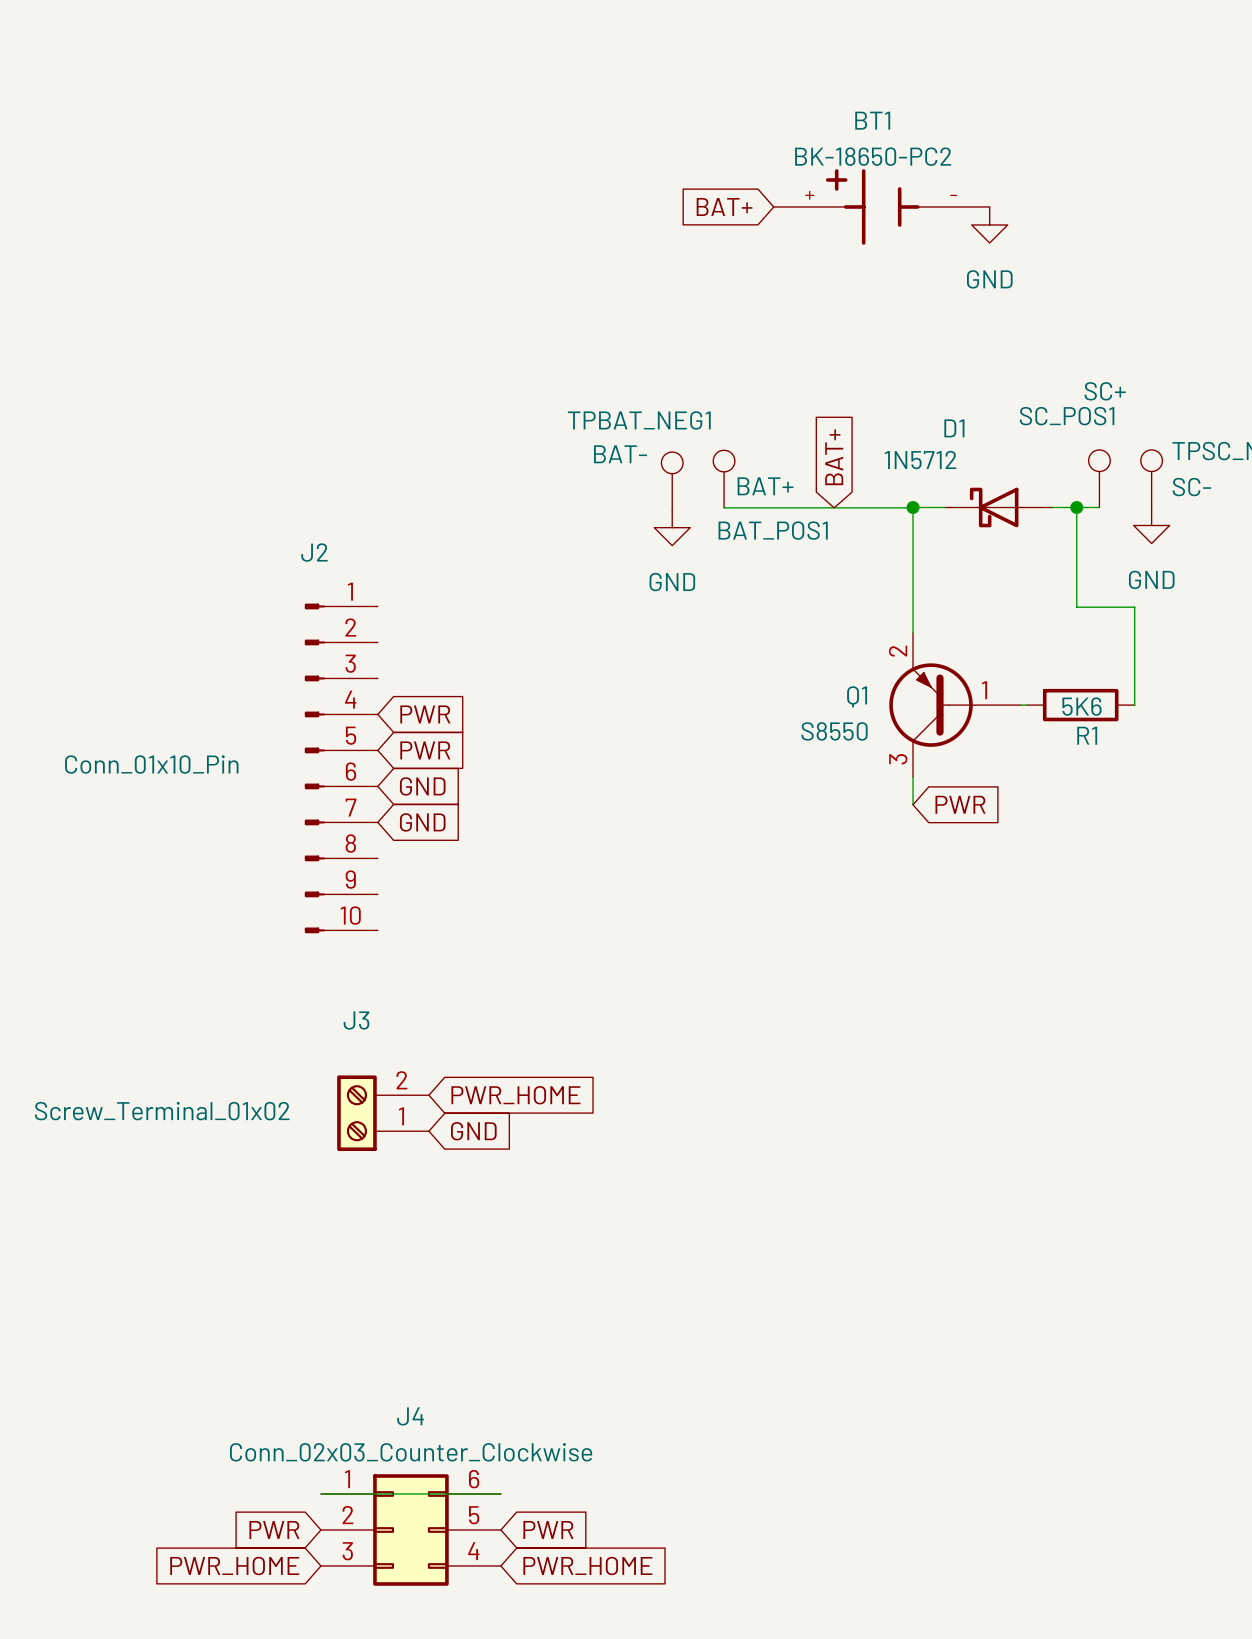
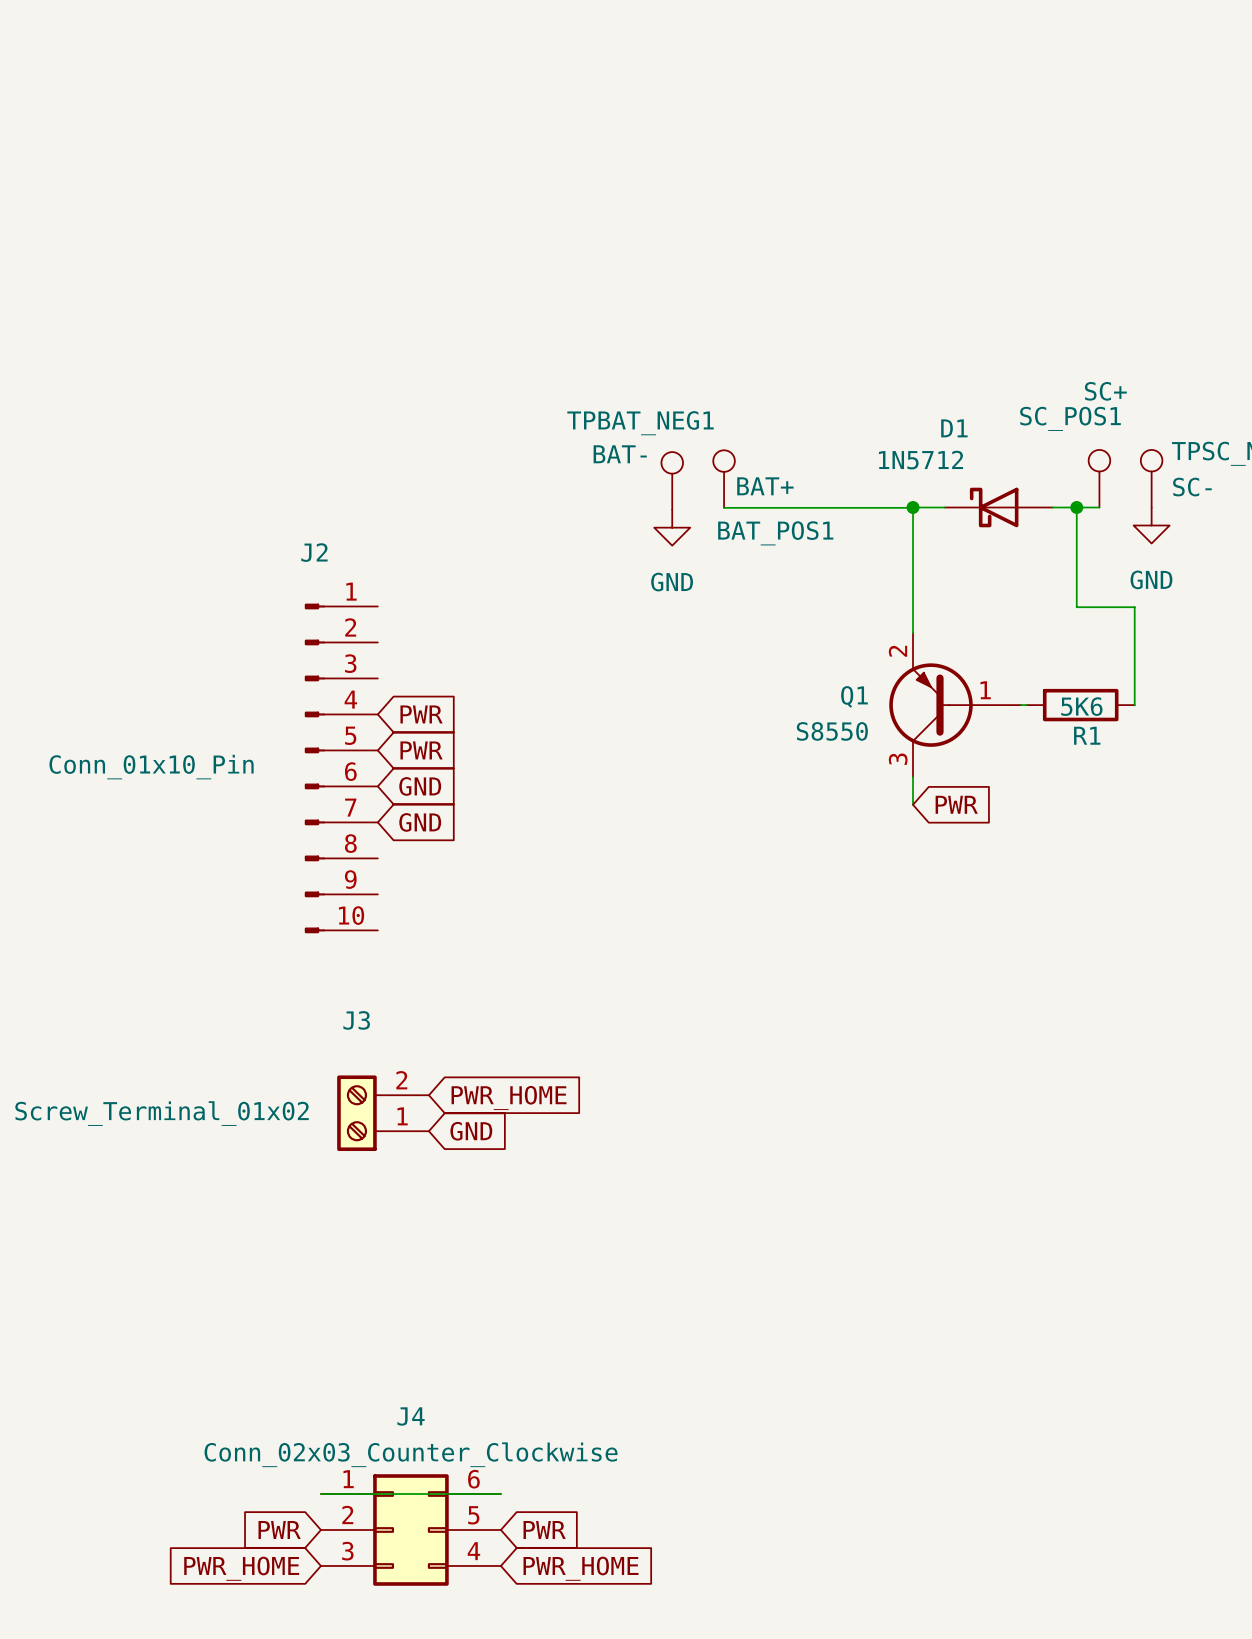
global label: BAT+ (724, 206) -> none
BT1: BK-18650-PC2 (881, 206) -> none
power symbol: GND (989, 224) -> none
global label: BAT+ (834, 457) -> none

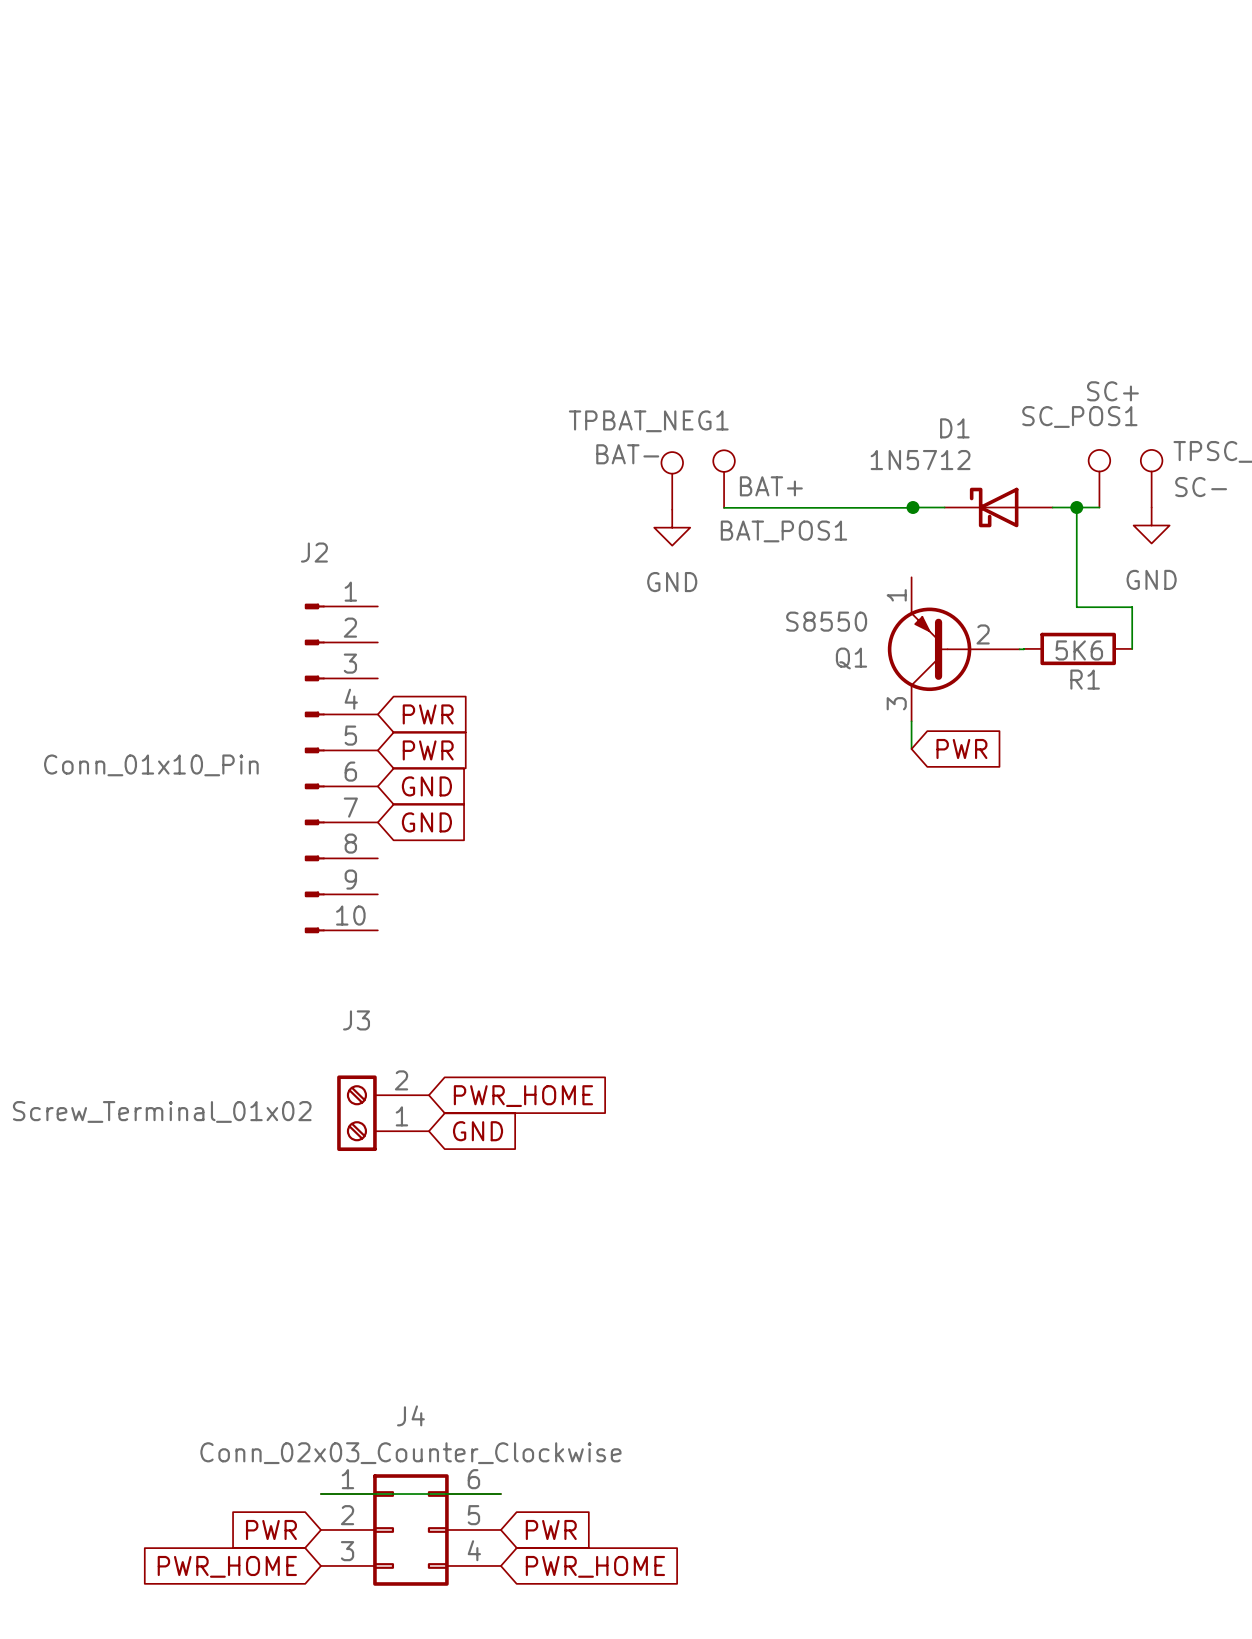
wire: (913, 507) (913, 633) -> none
wire: (1132, 607) (1134, 607) (1134, 705) -> (1132, 607) (1132, 648)
wire: none -> (1024, 648) (1019, 649)
Q1 pin number: 2 (898, 651) -> 1 (896, 595)
Q1 pin number: 1 (985, 690) -> 2 (983, 634)
Q1 name position: Q1 (854, 696) -> Q1 (851, 658)
Q1 position: (955, 705) -> (953, 649)
wire: (1020, 705) (1026, 705) -> none
R1 position: (1080, 705) -> (1078, 648)
Q1 value position: S8550 (832, 731) -> S8550 (826, 621)
wire: (913, 777) (913, 804) -> (911, 721) (911, 749)
global label position: PWR (956, 804) -> PWR (961, 749)

